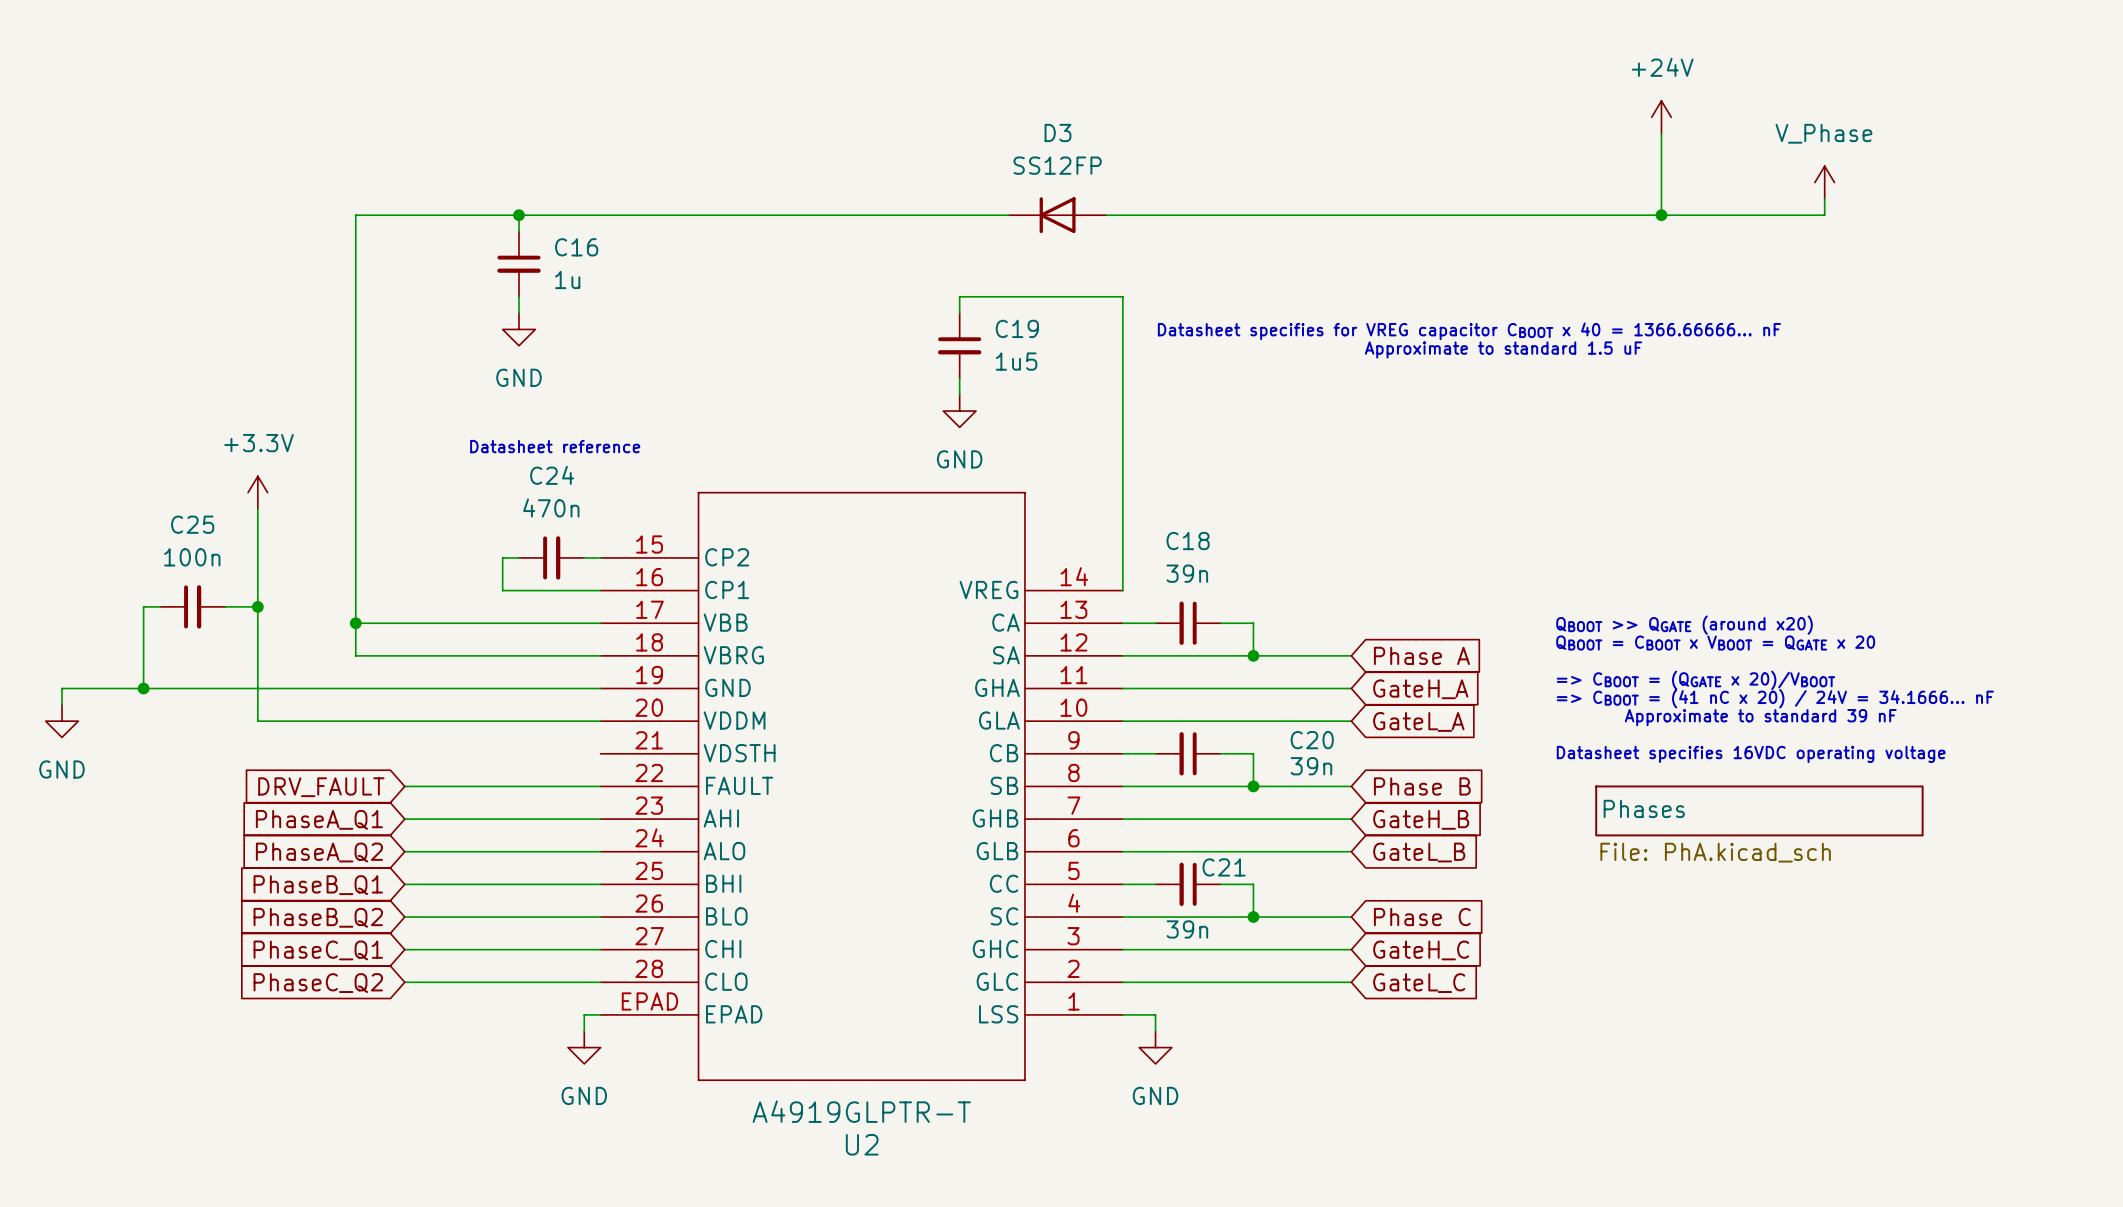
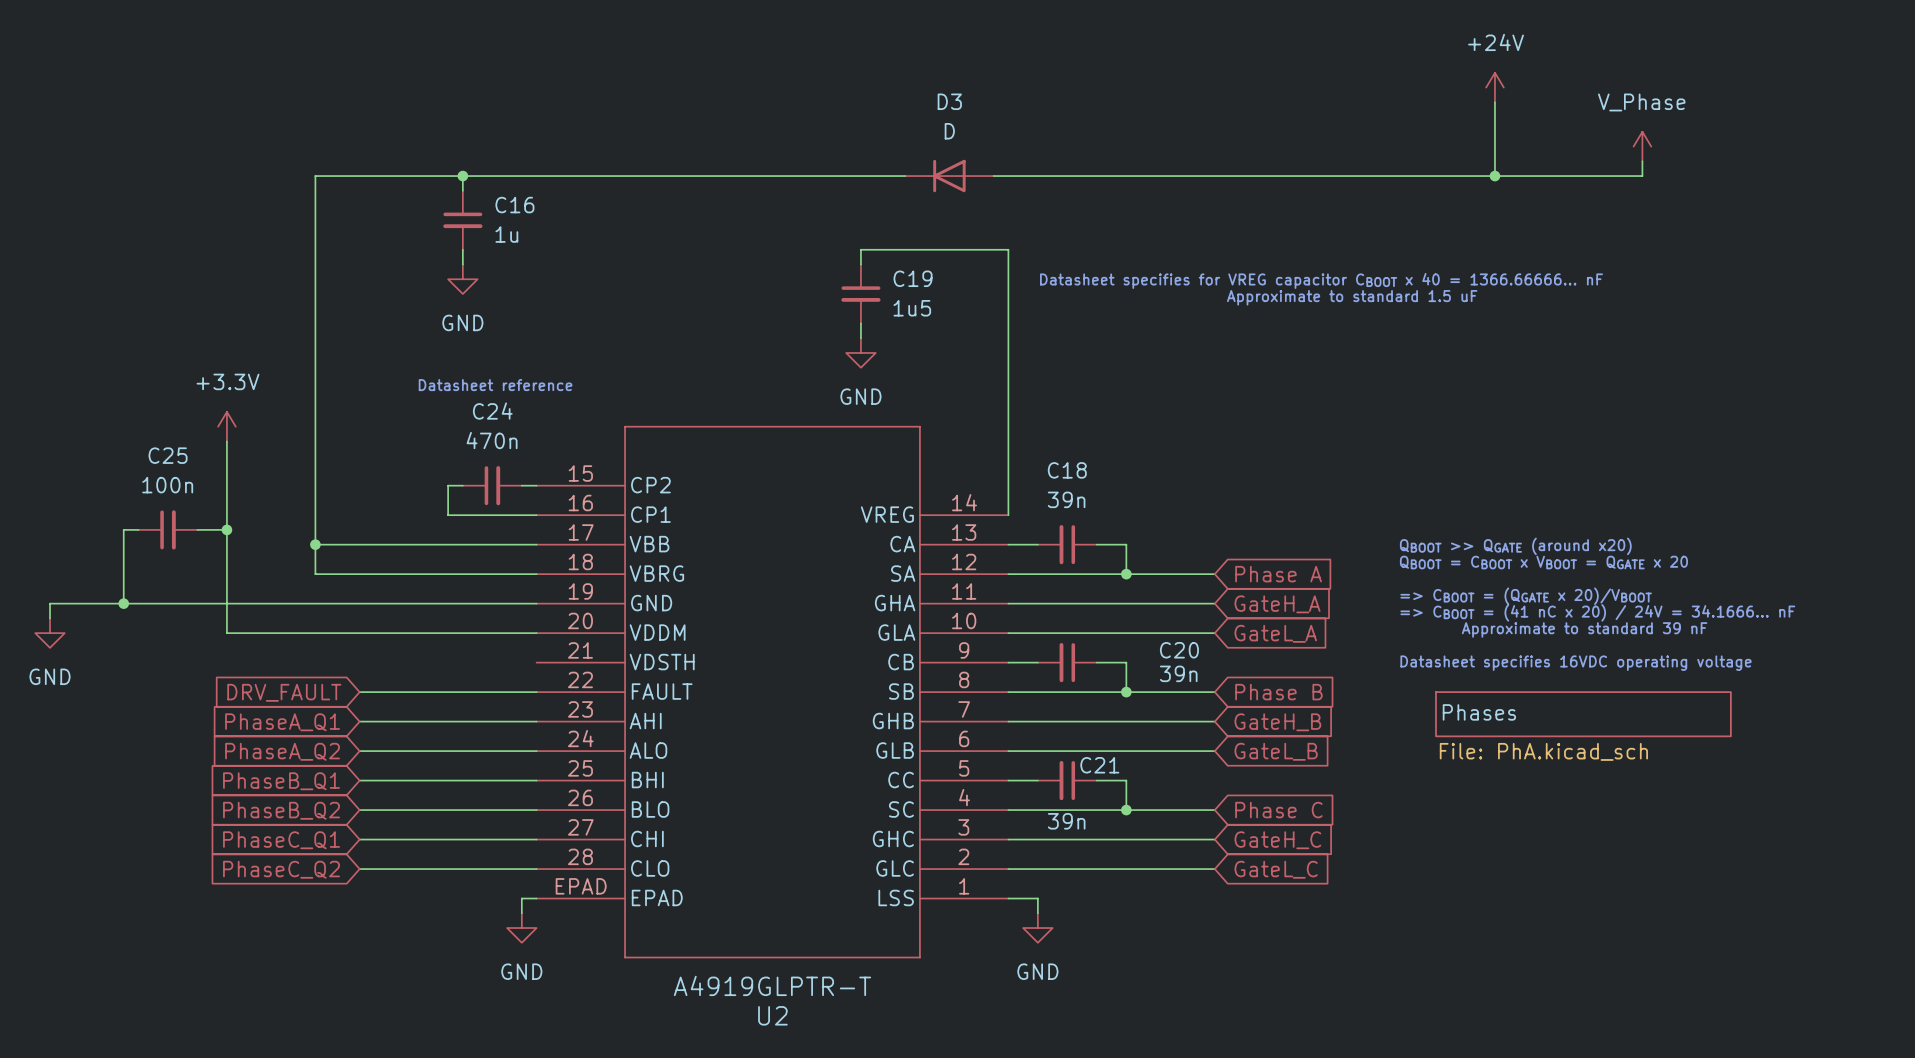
D3 value: SS12FP (1057, 165) -> D (949, 131)

